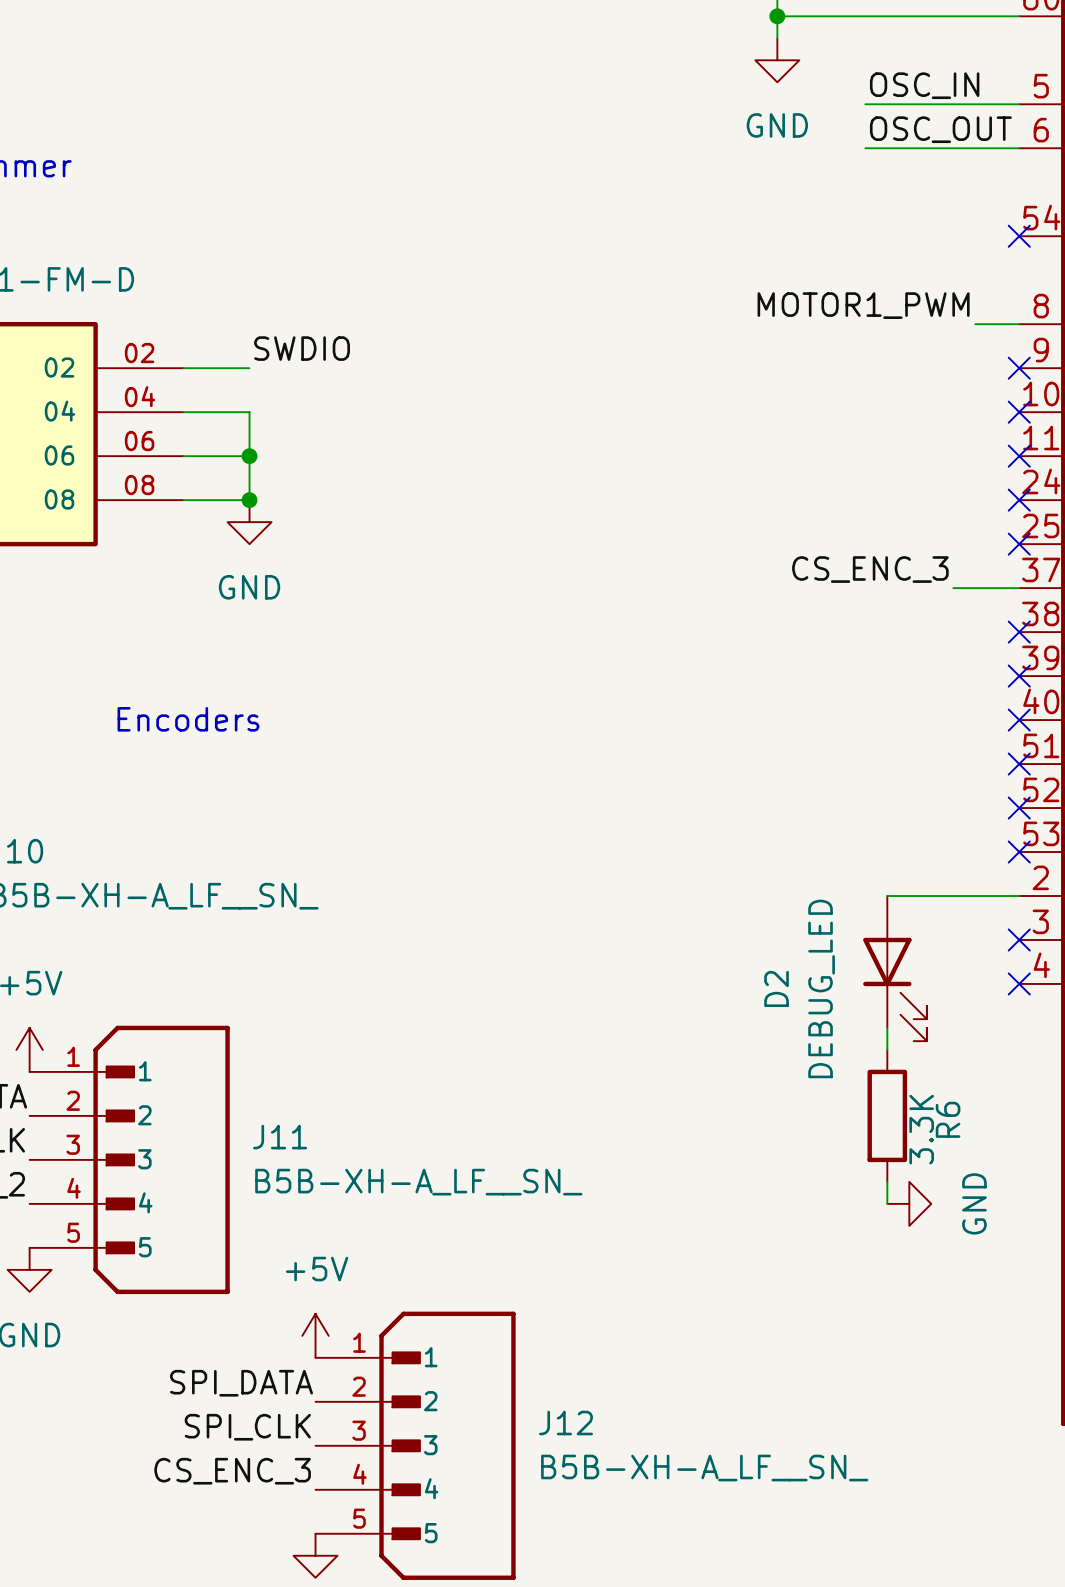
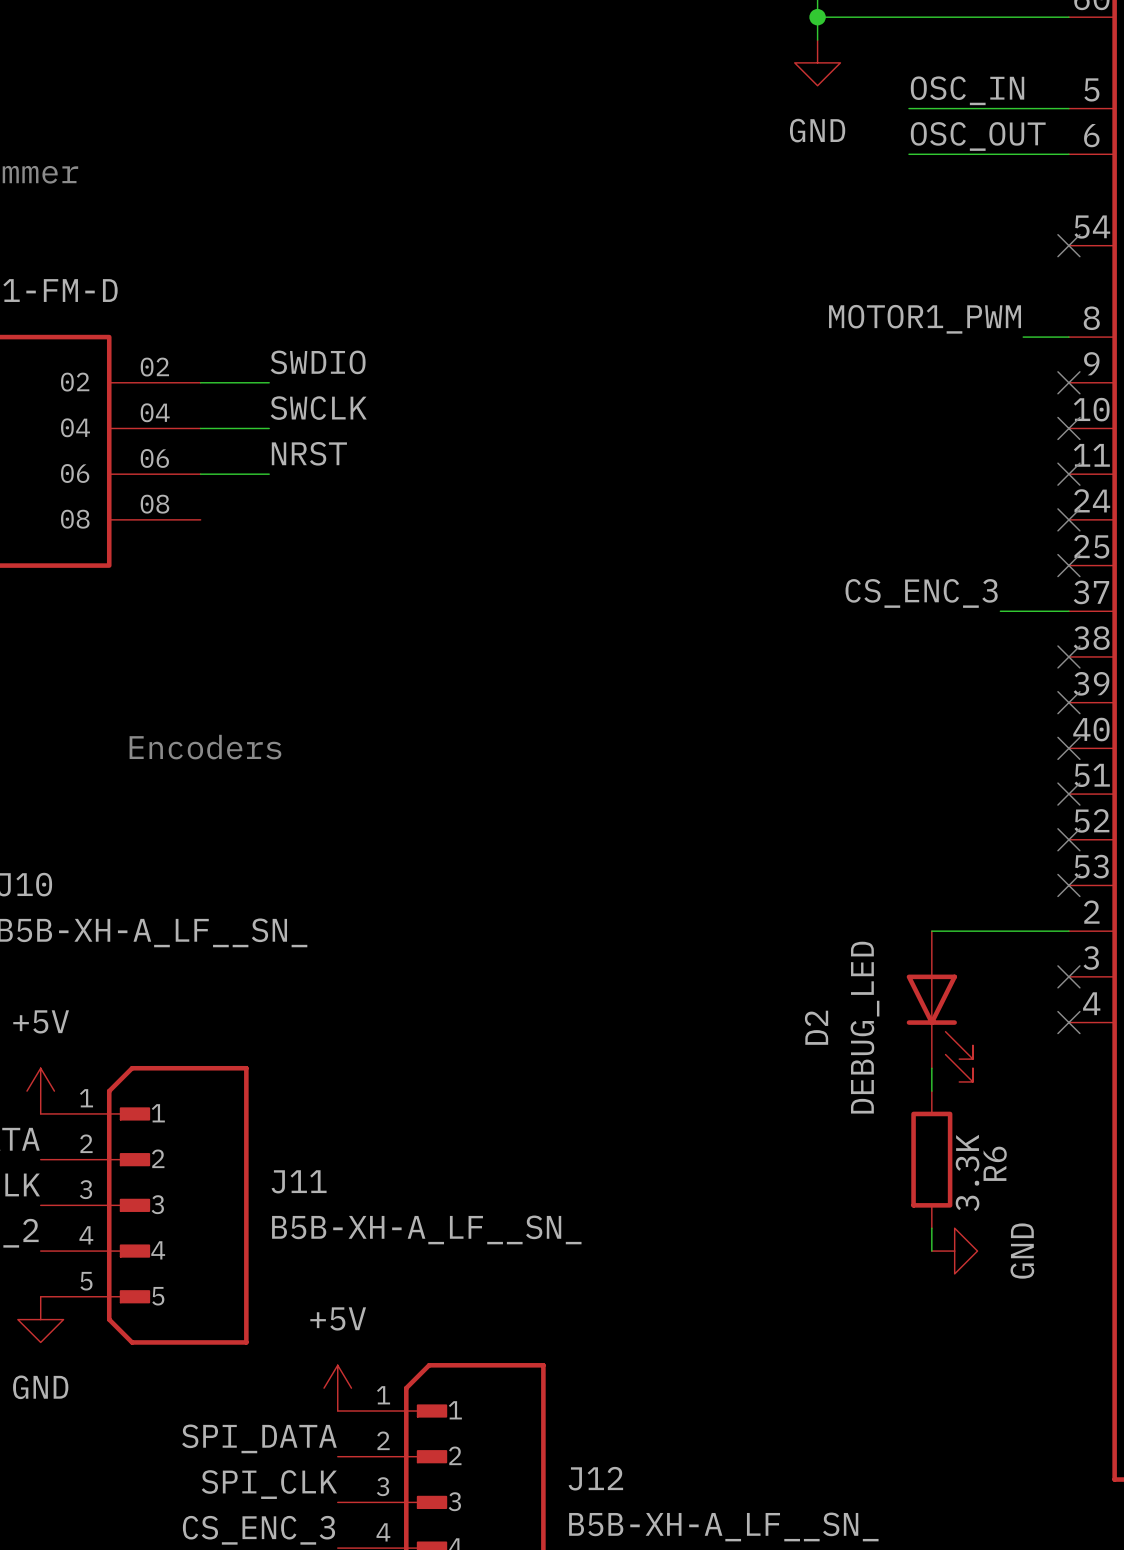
label: none -> SWCLK (318, 408)
wire: (249, 412) (249, 500) (183, 500) -> none
label: none -> NRST (309, 453)
junction: (249, 456) -> none
junction: (249, 500) -> none
power symbol: GND (249, 522) -> none

